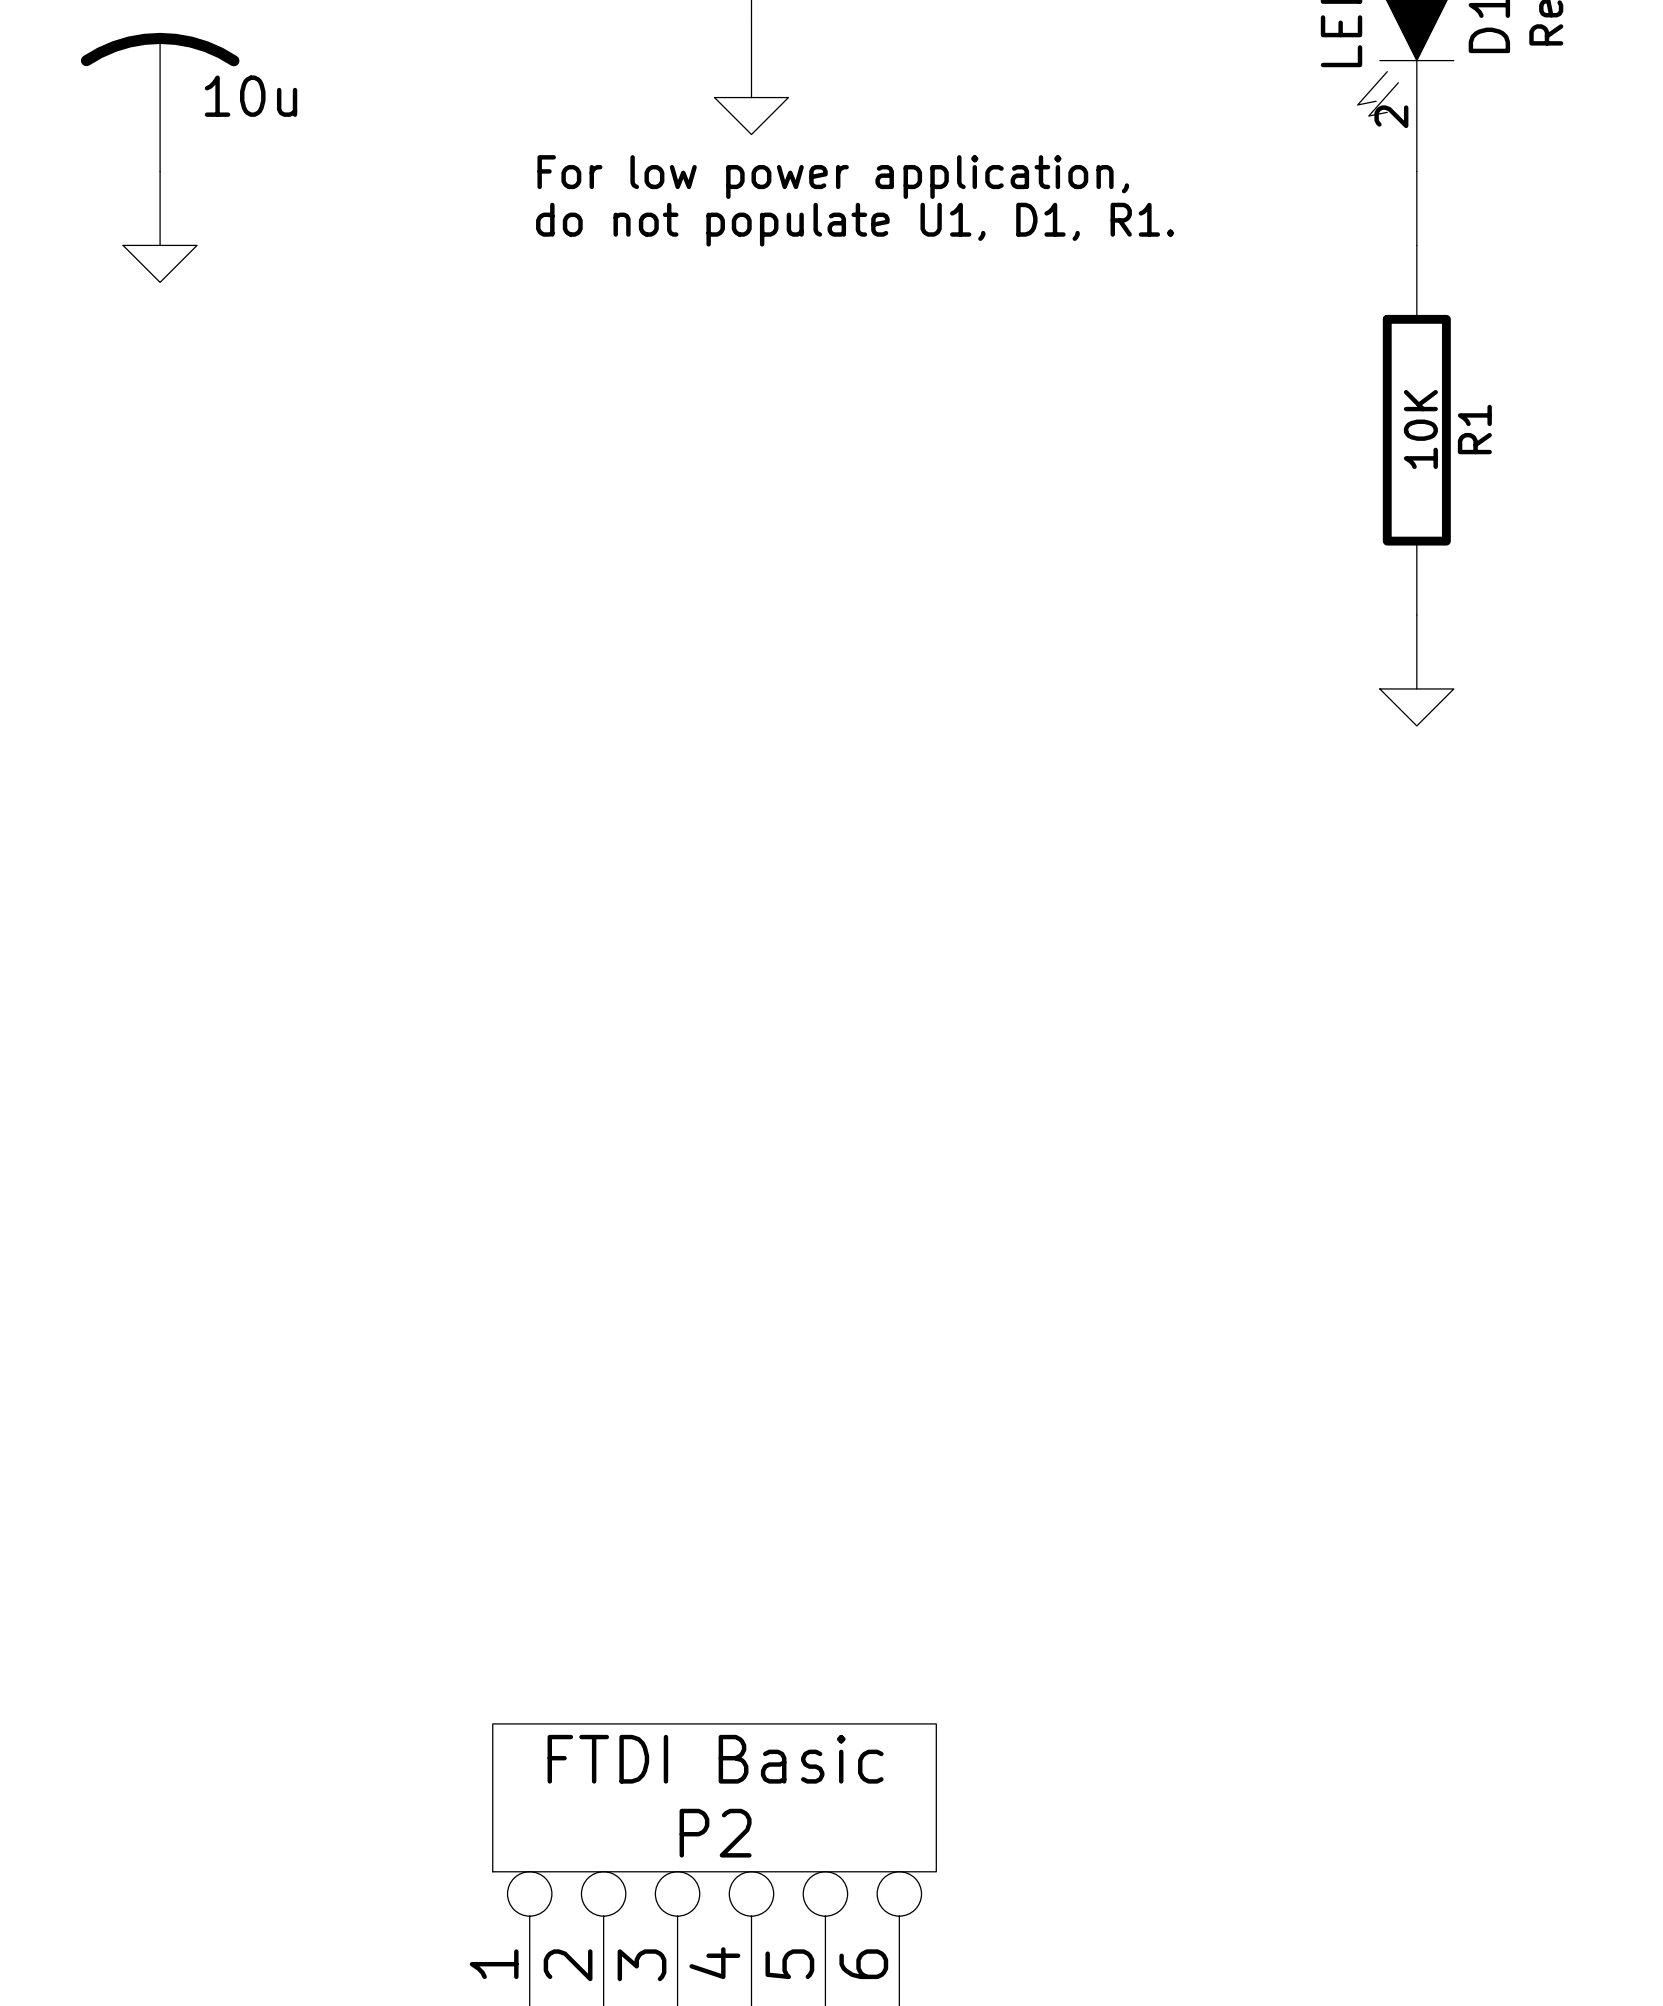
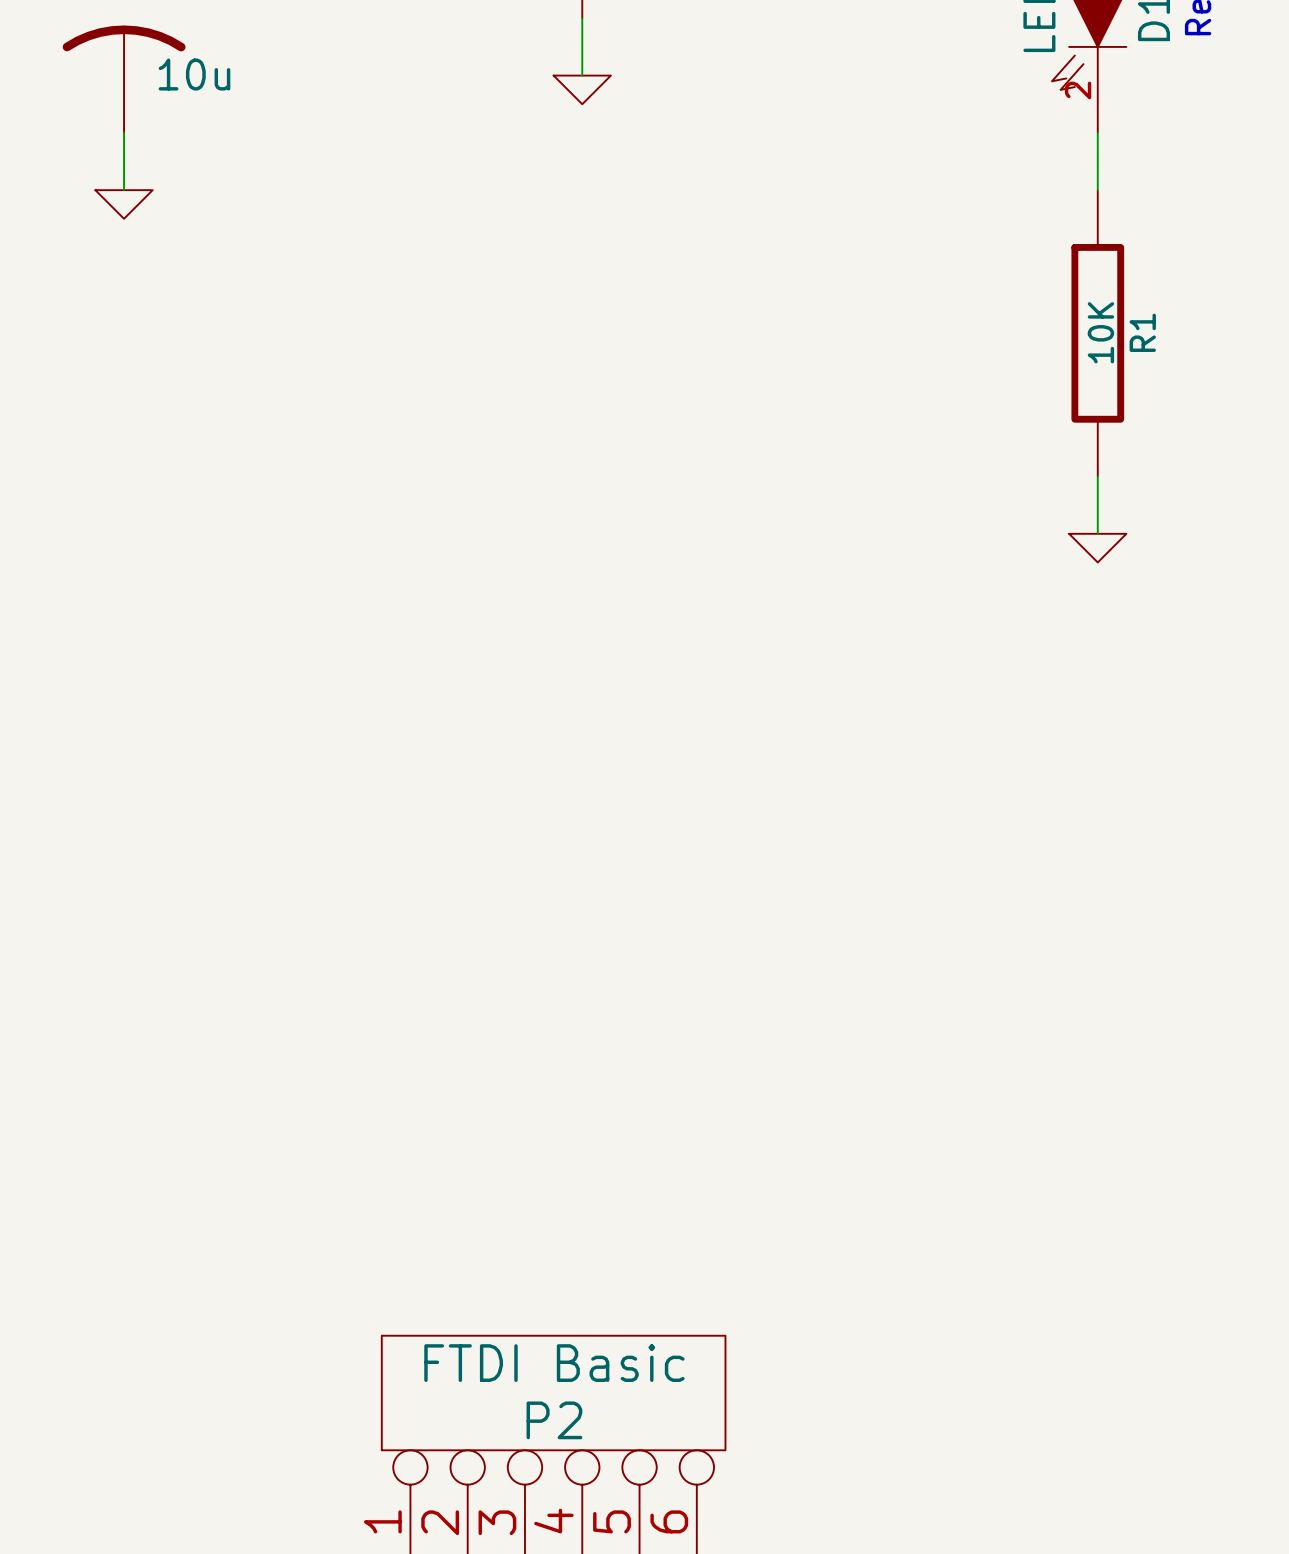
text: For low power application, (833, 177) -> none
text: do not populate U1, D1, R1. (855, 224) -> none

